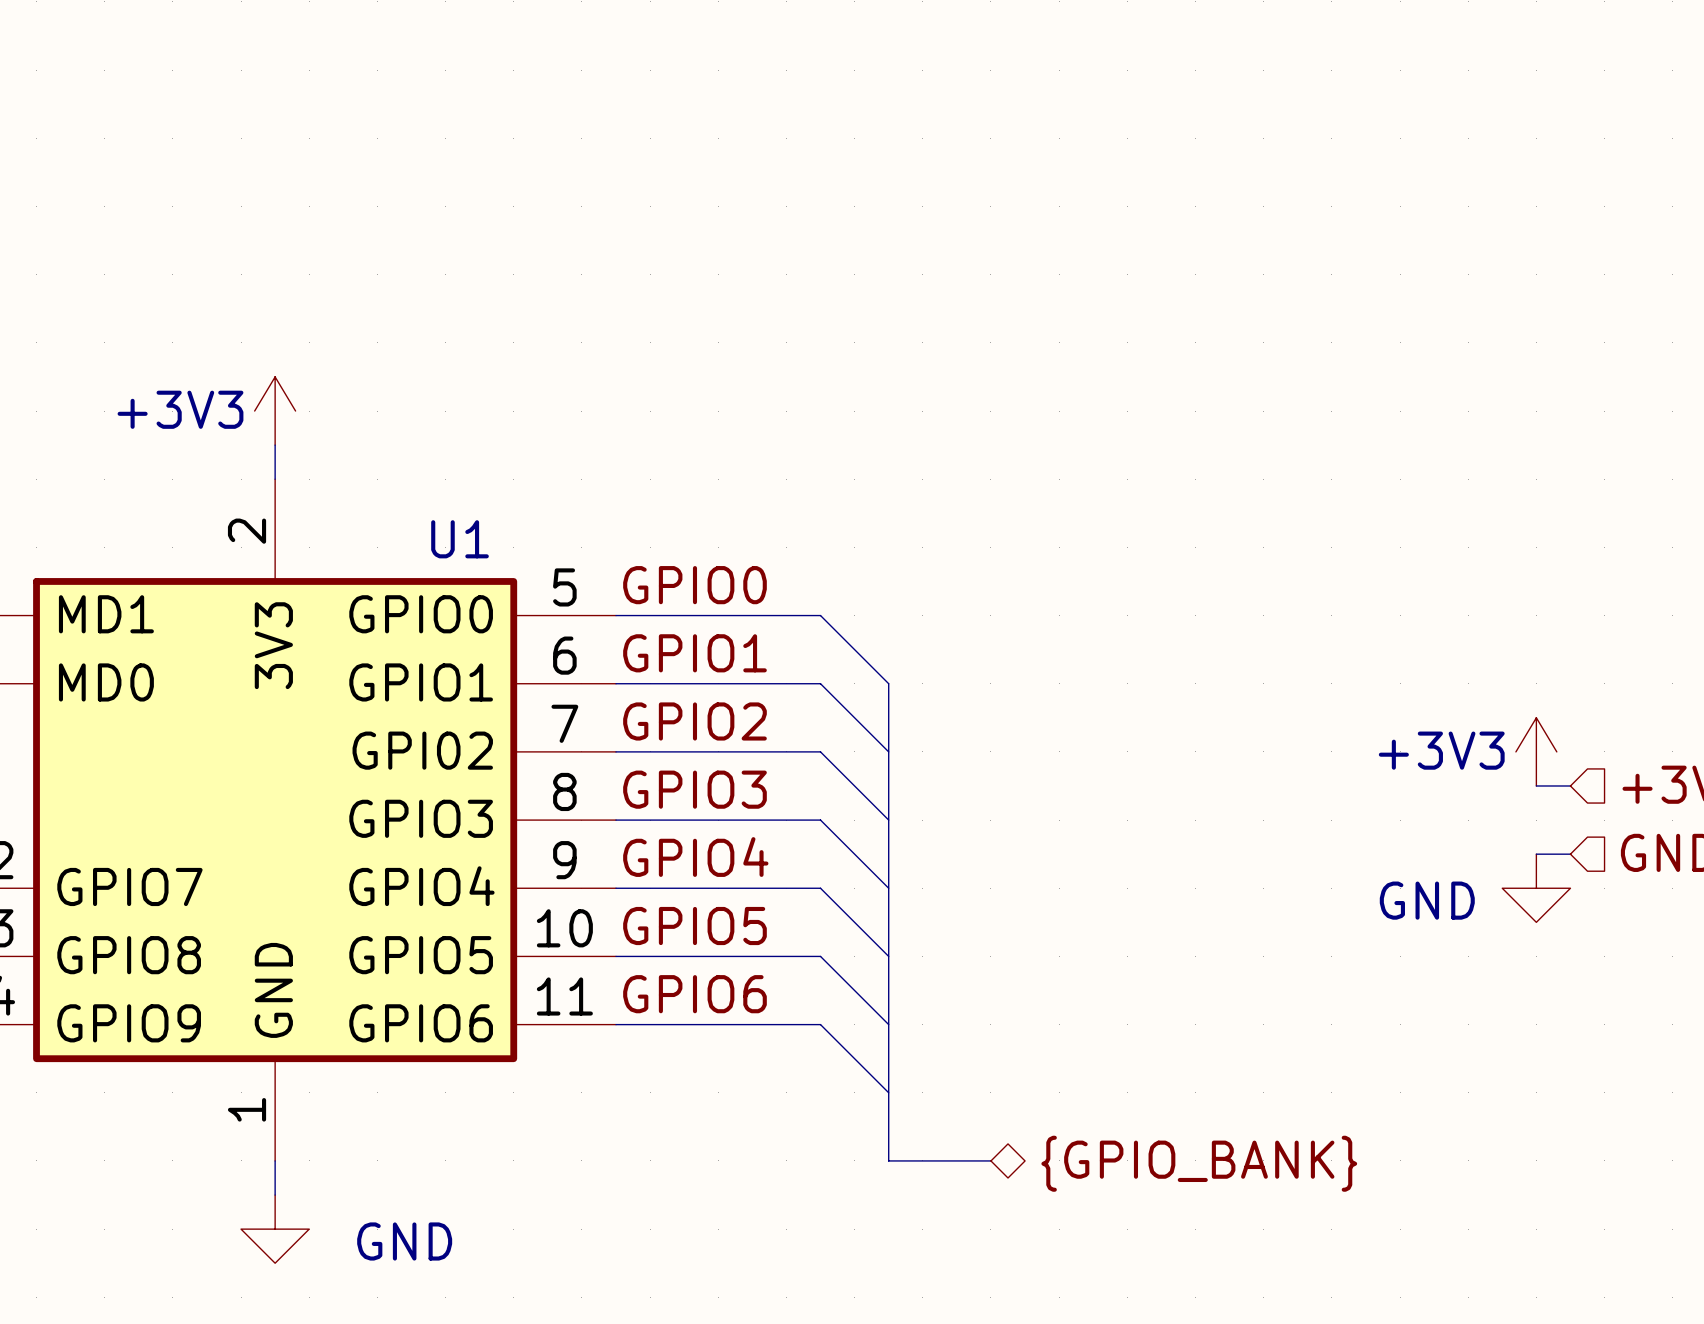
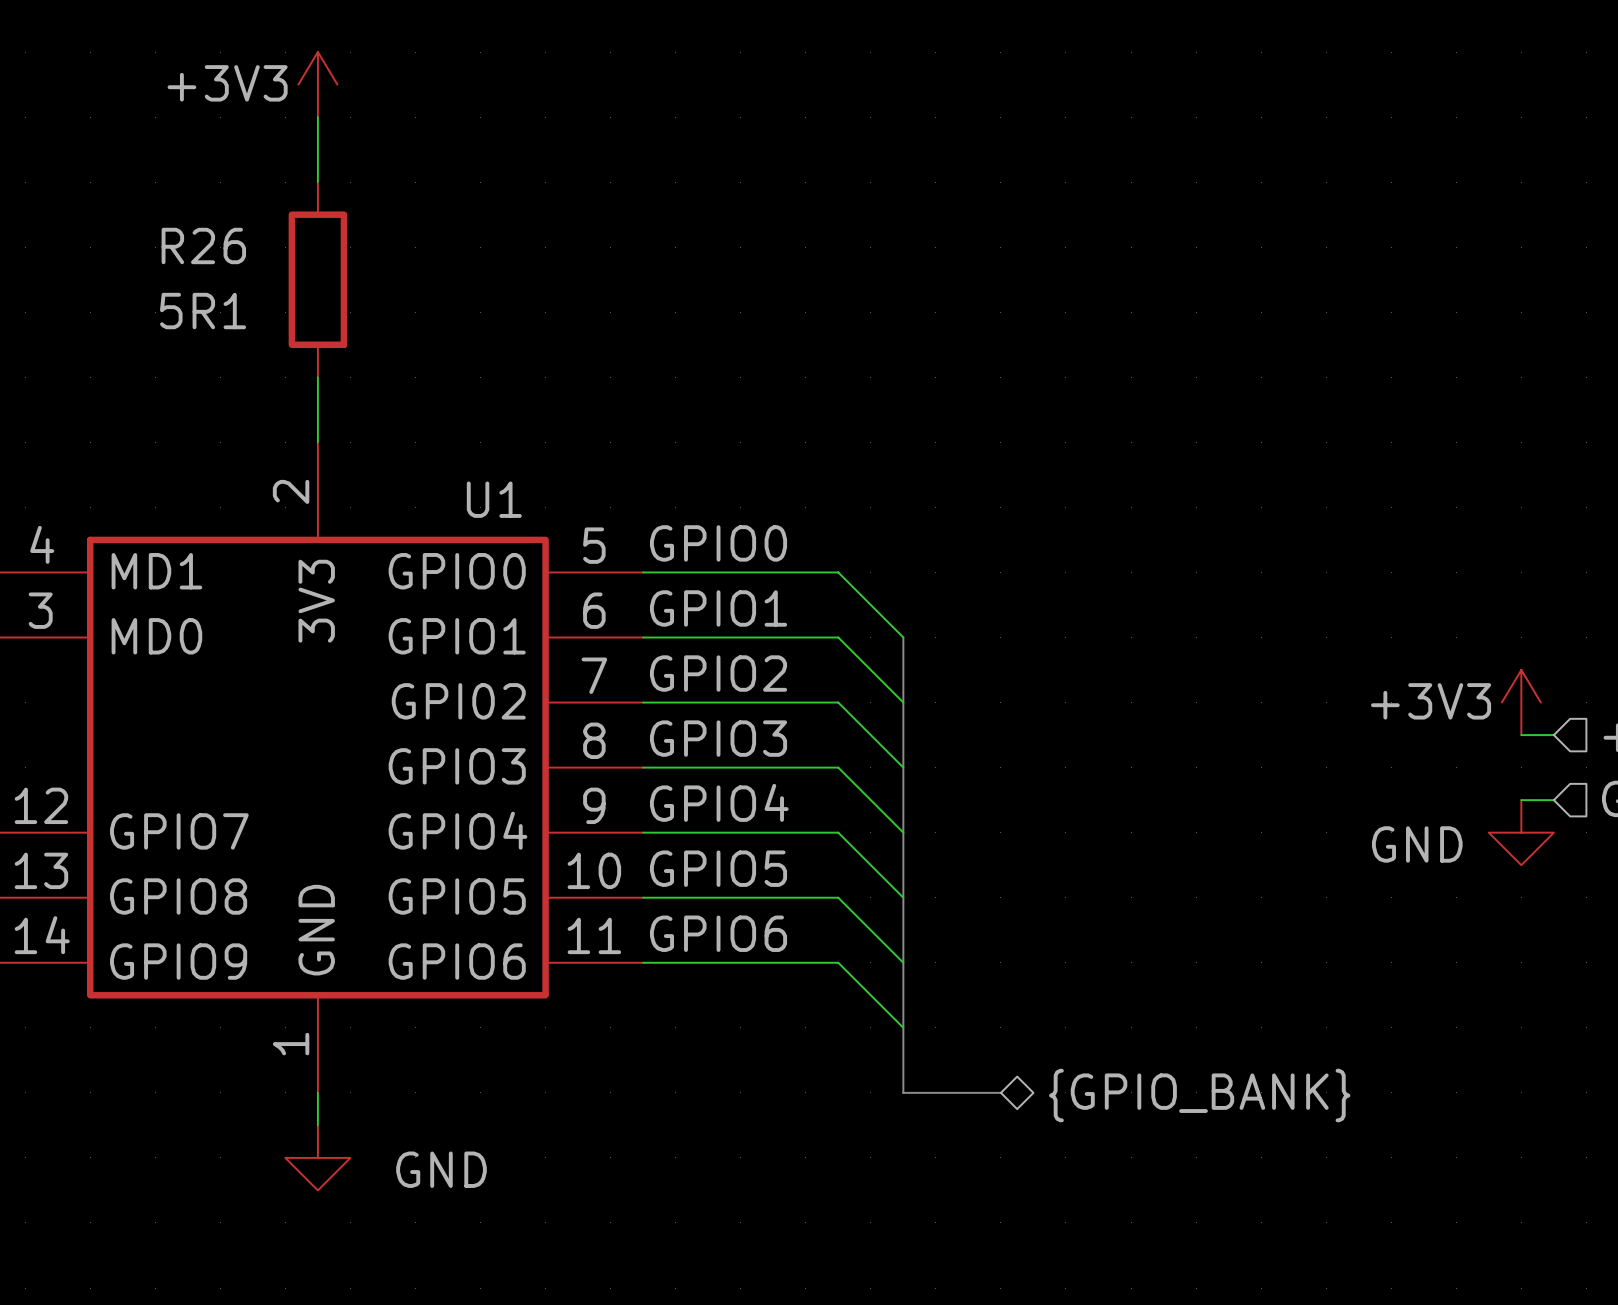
wire: none -> (317, 117) (317, 182)
R26: none -> 5R1 (317, 279)
power symbol position: +3V3 (275, 411) -> +3V3 (317, 84)

